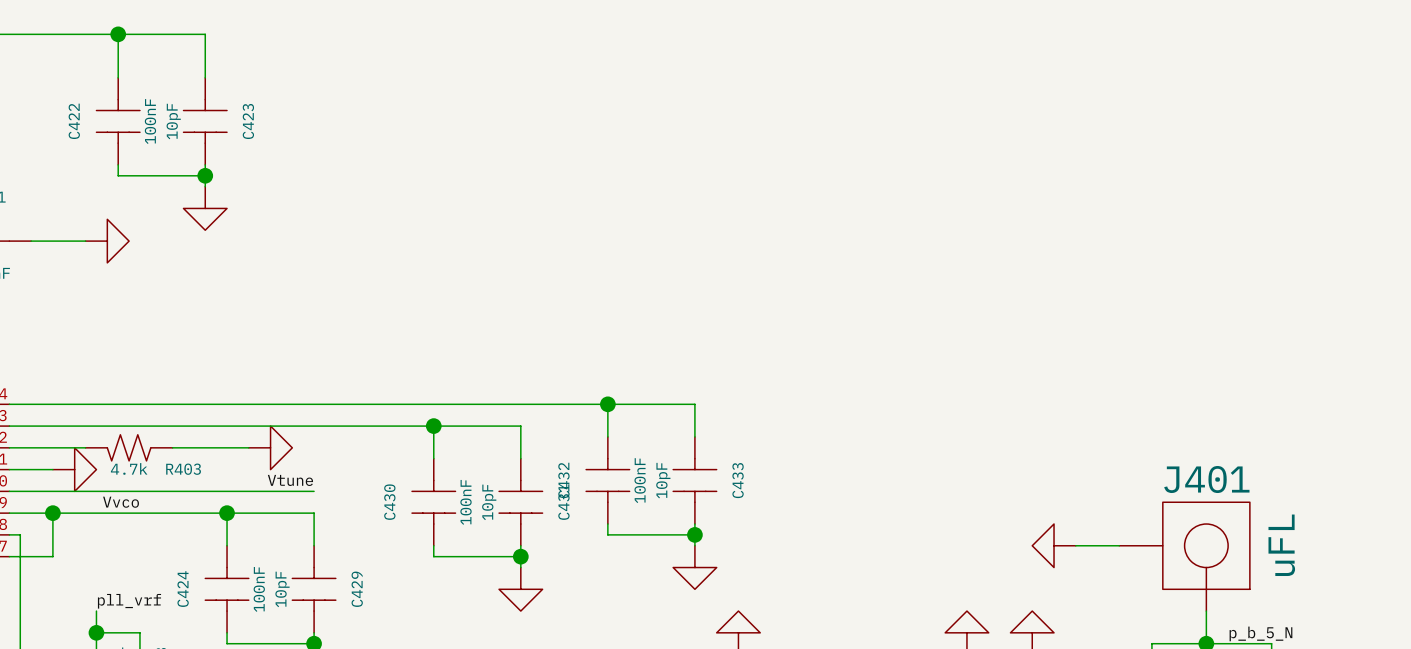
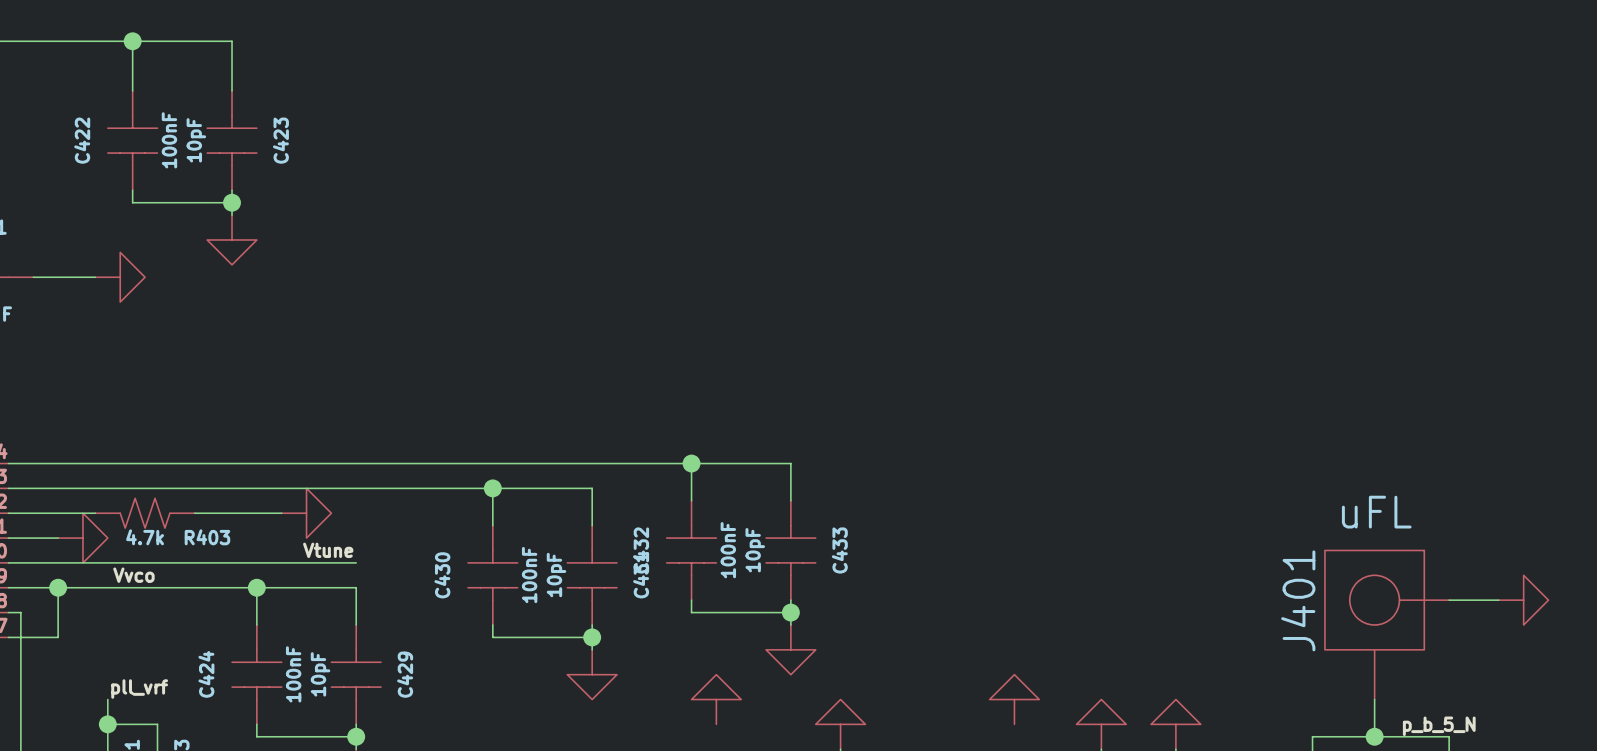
power symbol: none -> (1523, 600)
power symbol: (1054, 545) -> none
wire: (1075, 545) (1119, 545) -> (1449, 600) (1498, 600)
J401 rotation: 0° (1206, 545) -> 90° counterclockwise (1374, 600)
power symbol: none -> (716, 699)
power symbol: none -> (1014, 699)

